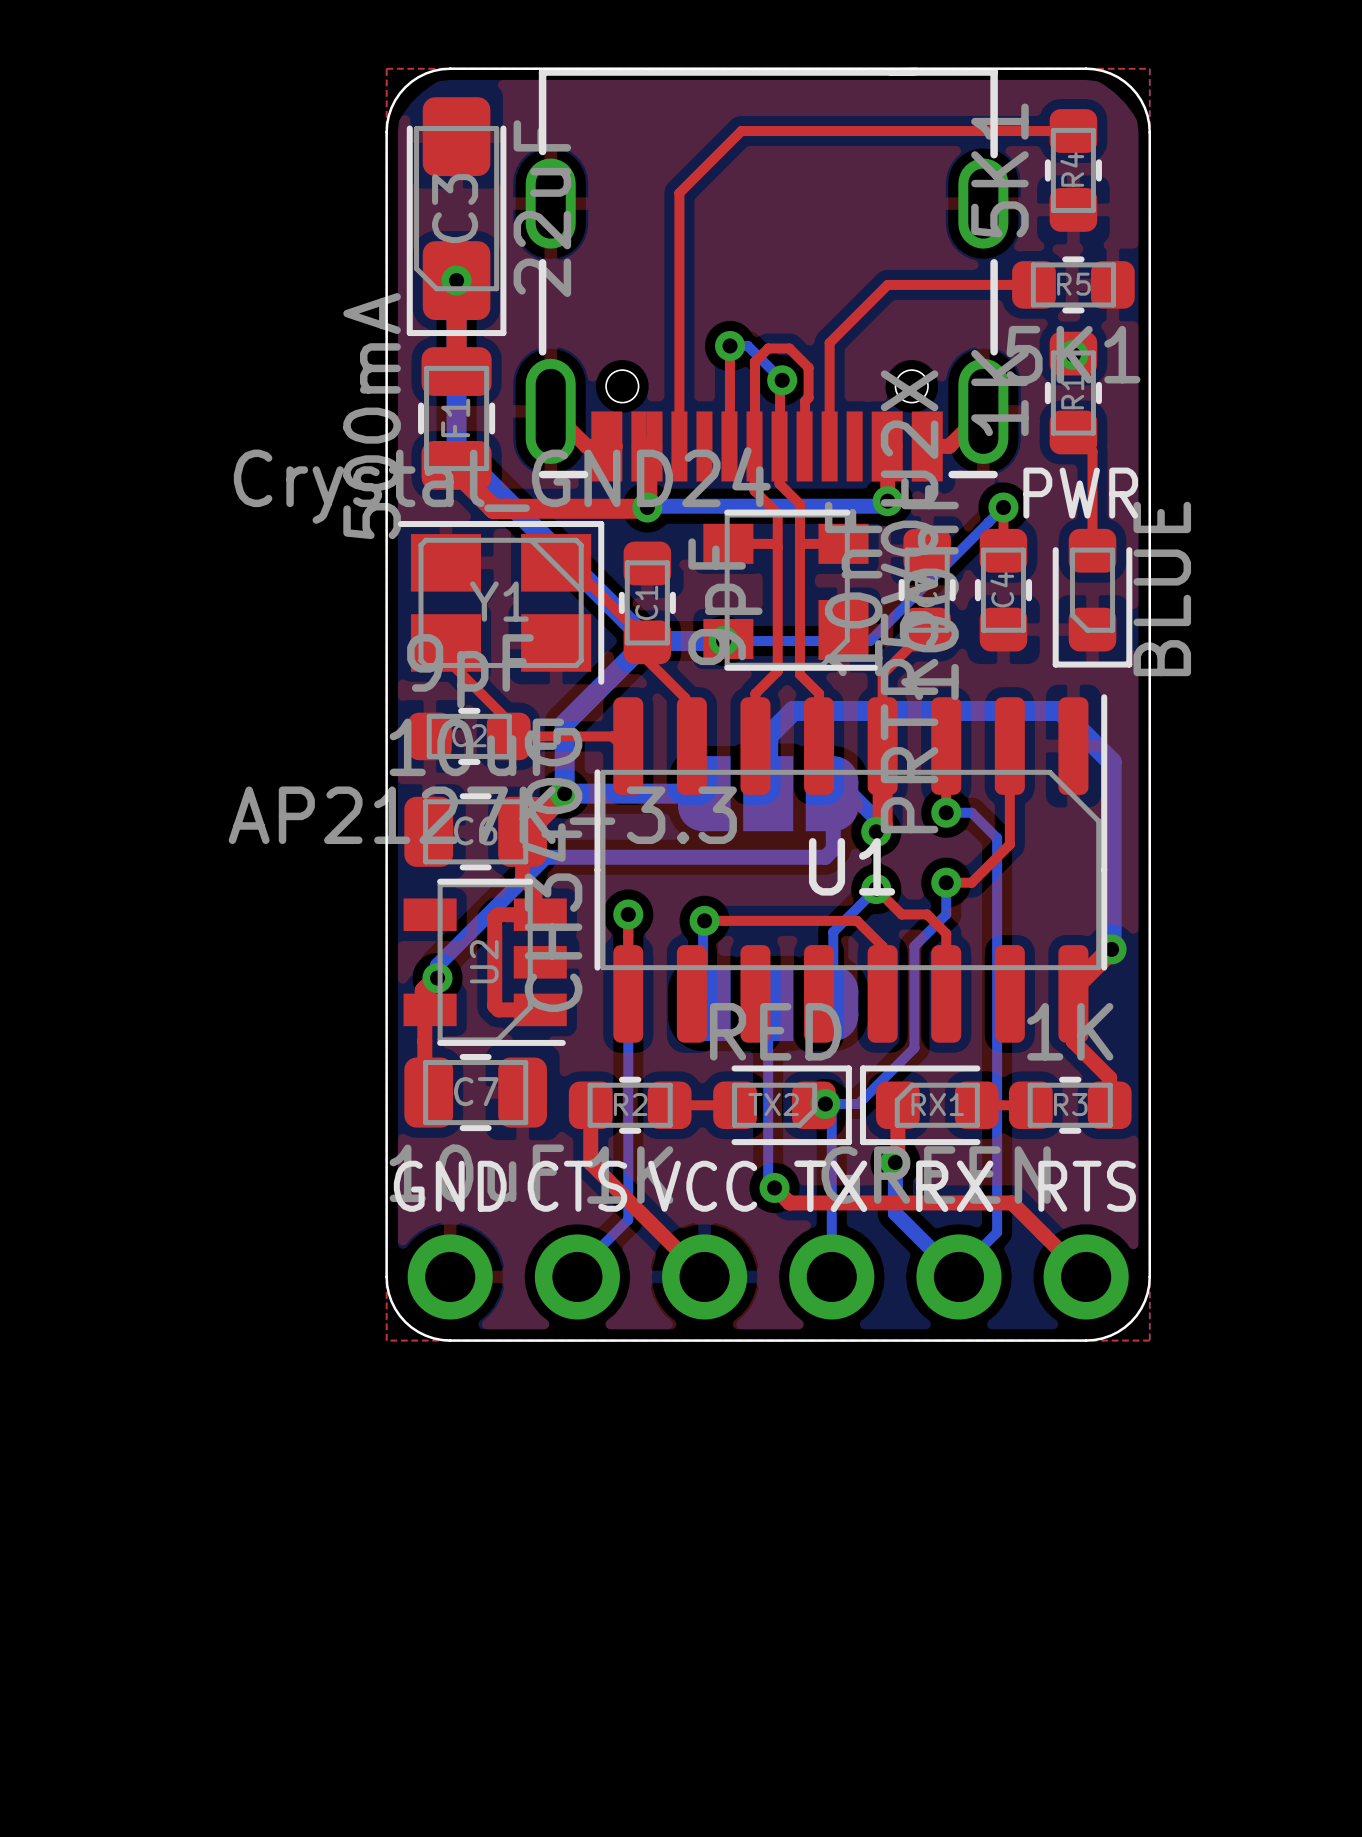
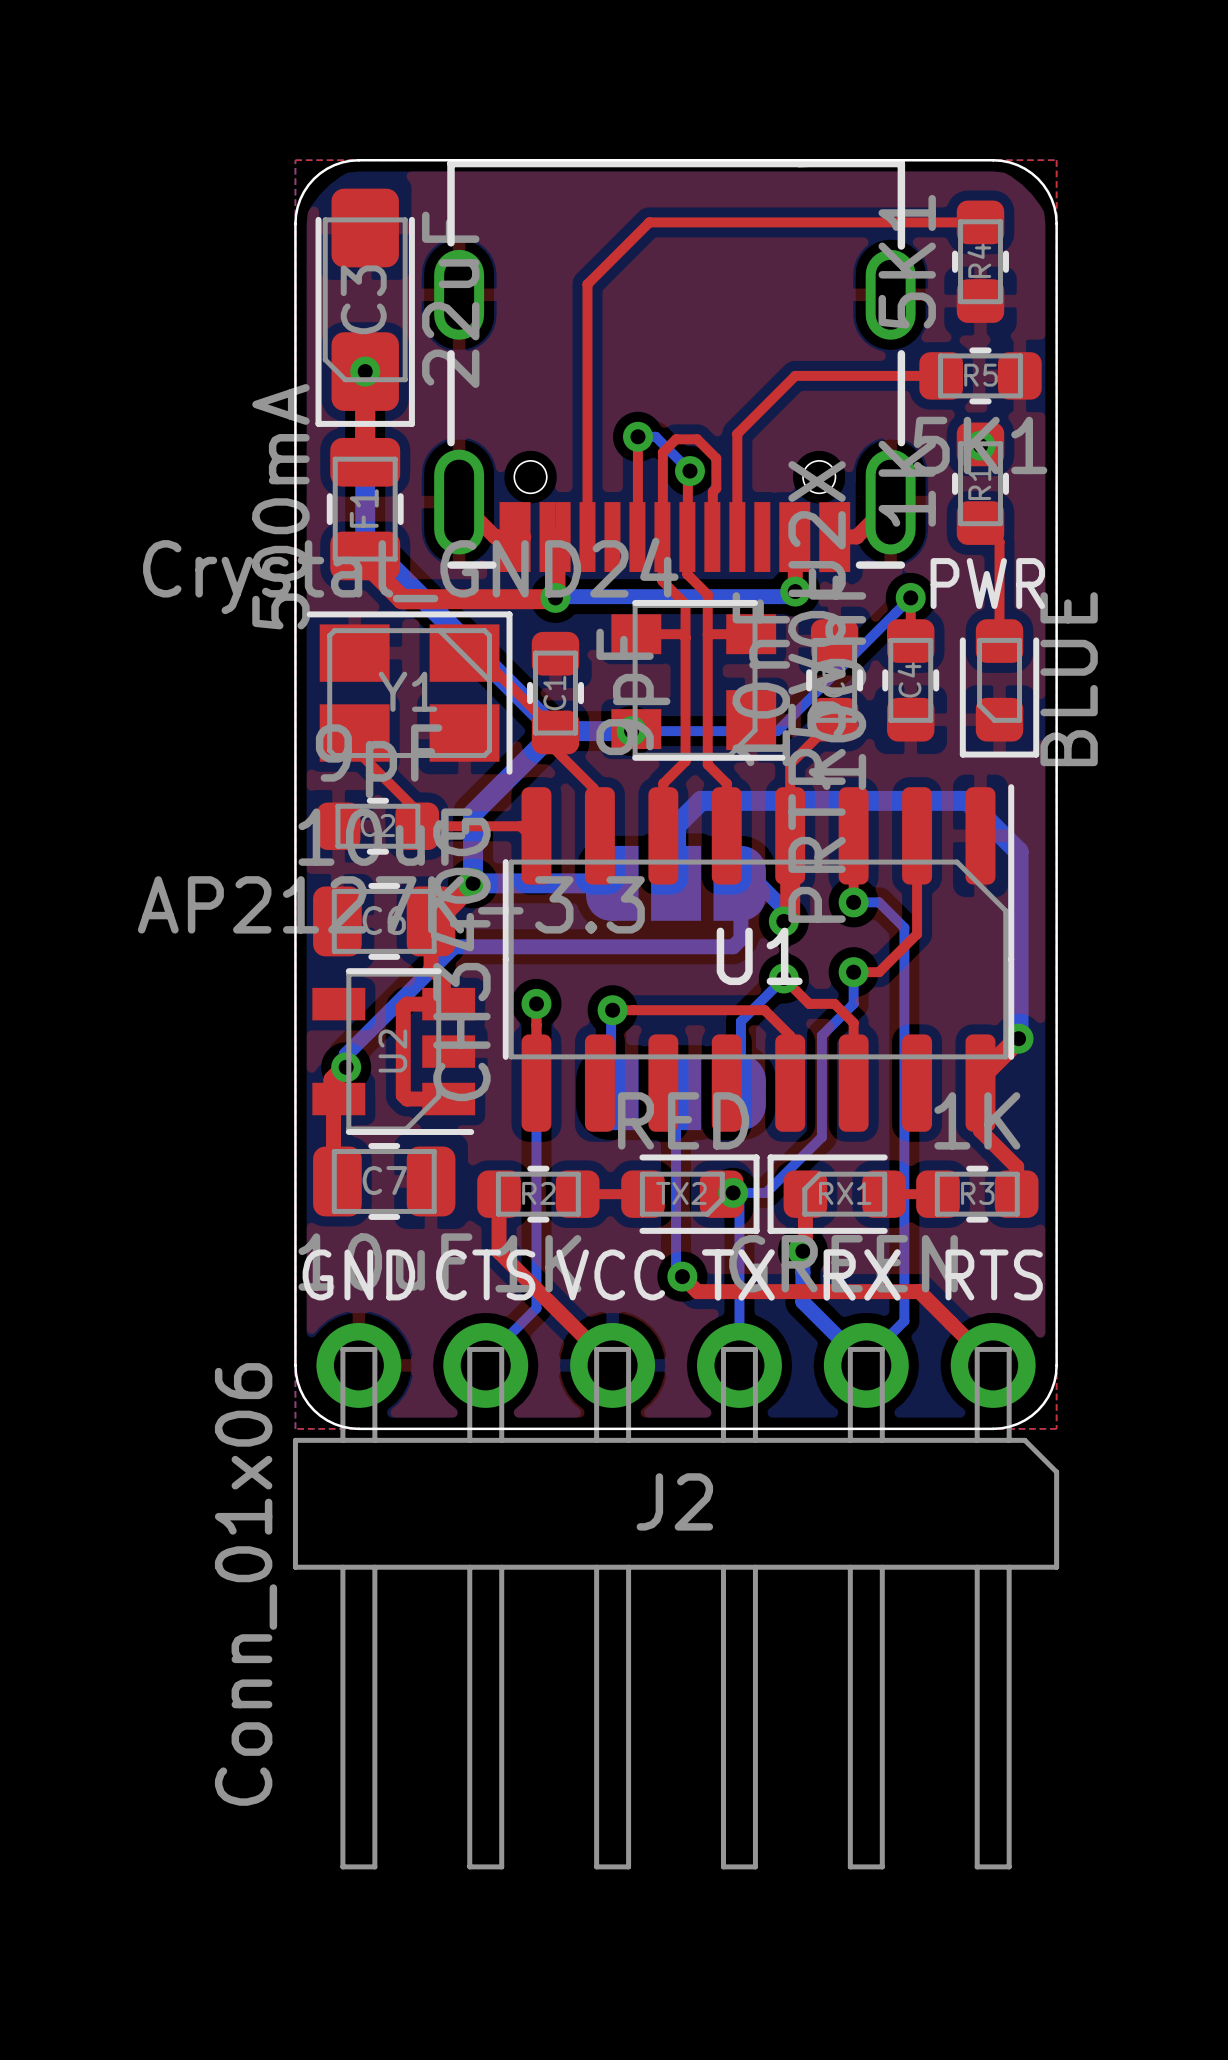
J2 side: bottom (768, 1276) -> top (676, 1596)

